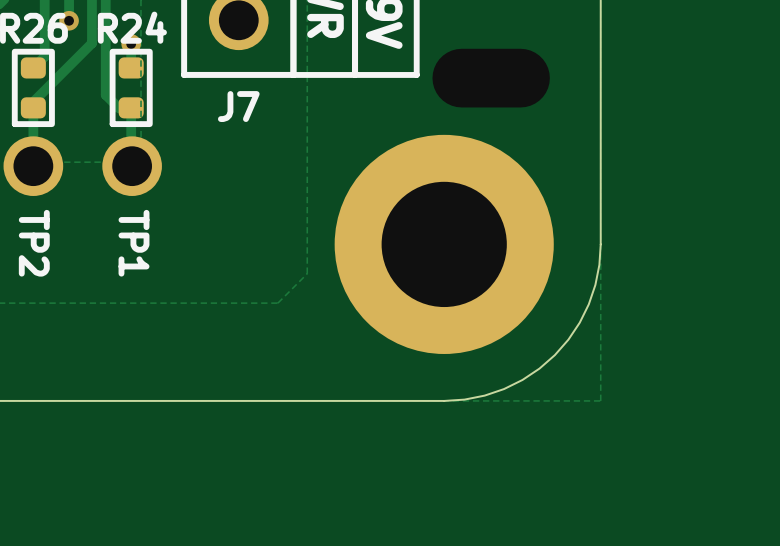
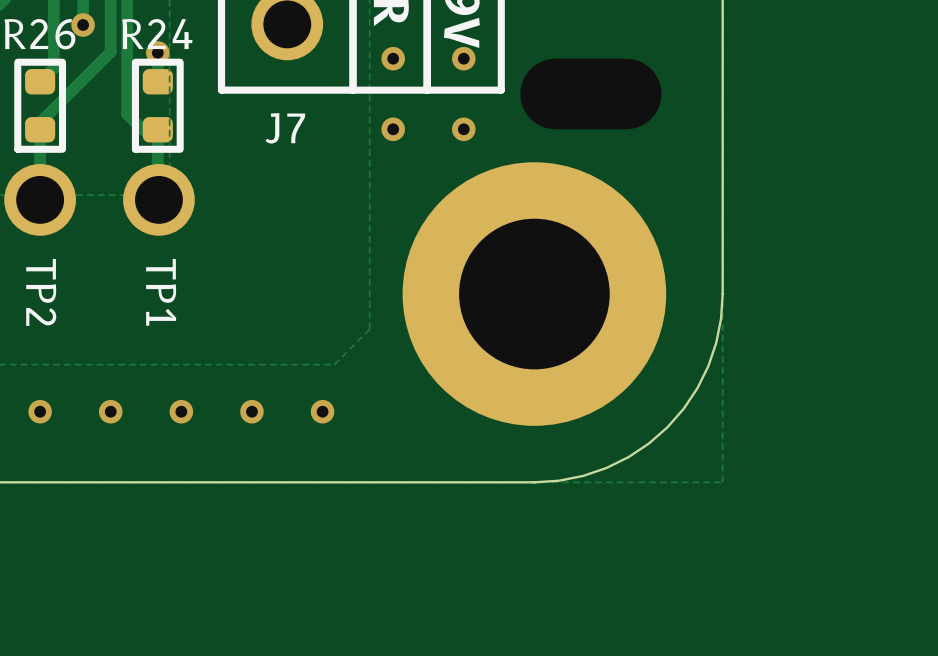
via: none -> (393, 58)
via: none -> (463, 58)
via: none -> (393, 129)
via: none -> (463, 129)
via: none -> (40, 411)
via: none -> (110, 411)
via: none -> (181, 411)
via: none -> (251, 411)
via: none -> (322, 411)

